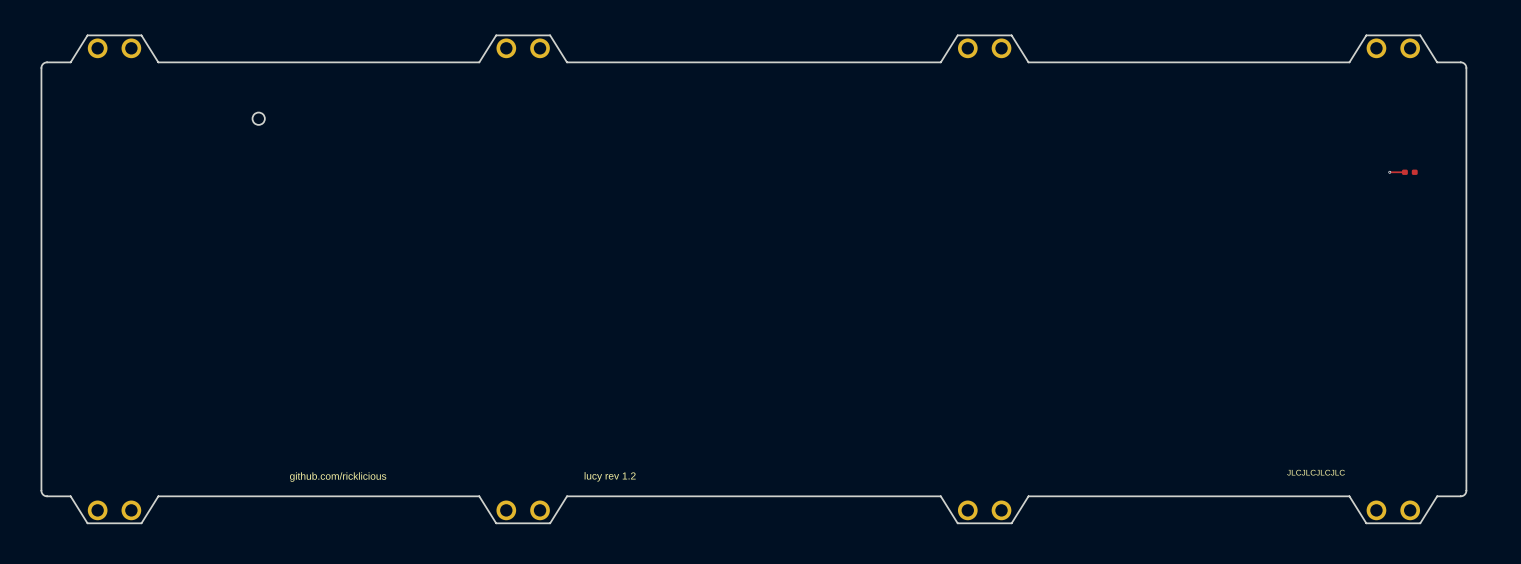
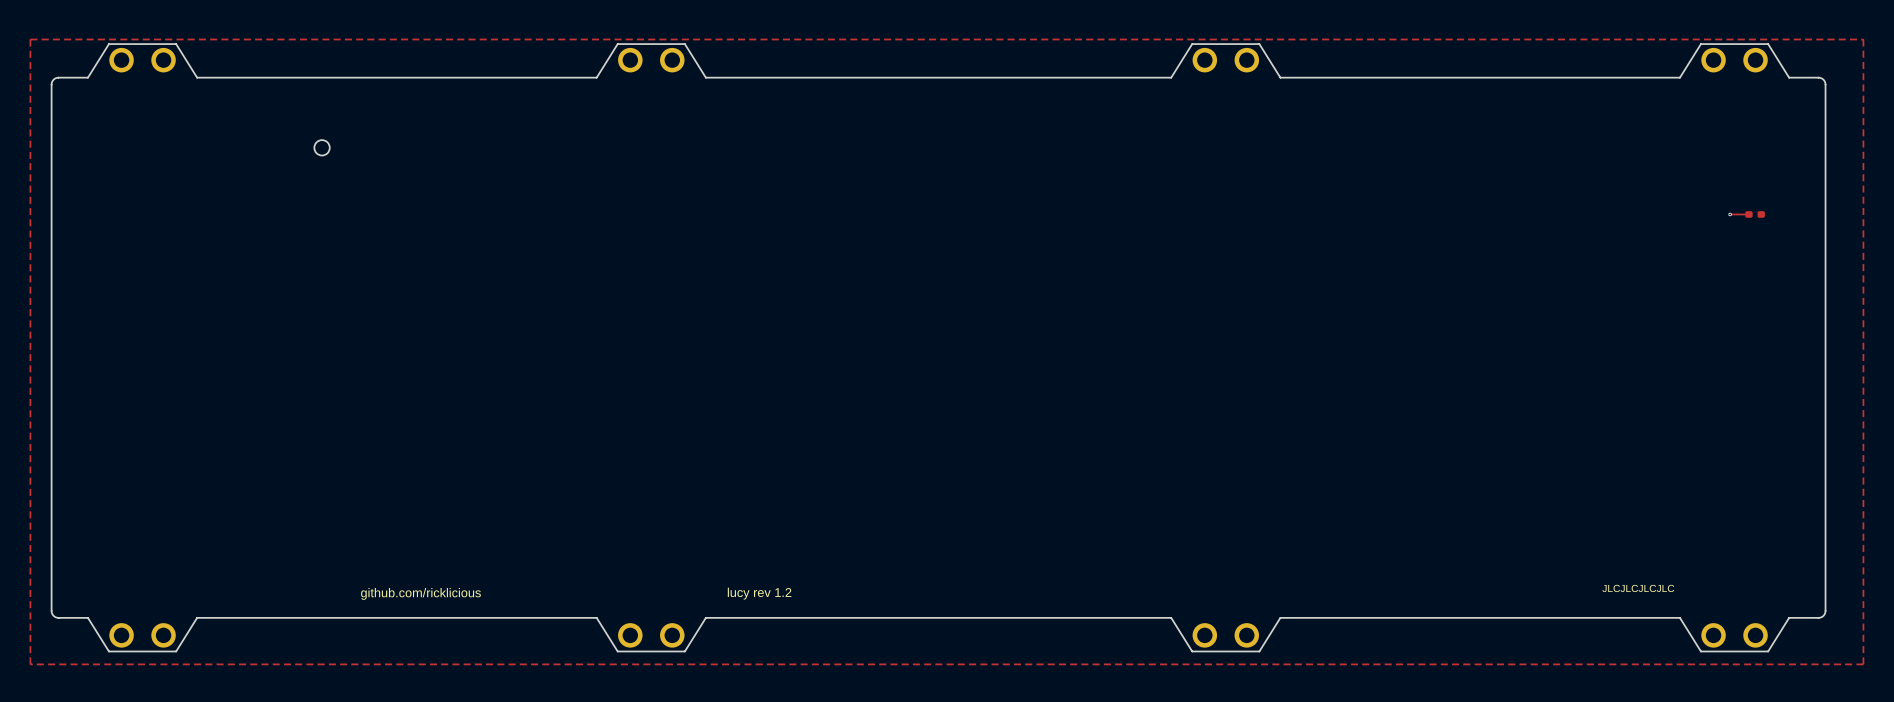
zone outline: none -> (30, 39) (30, 664) (1863, 664) (1863, 39) (30, 39)

